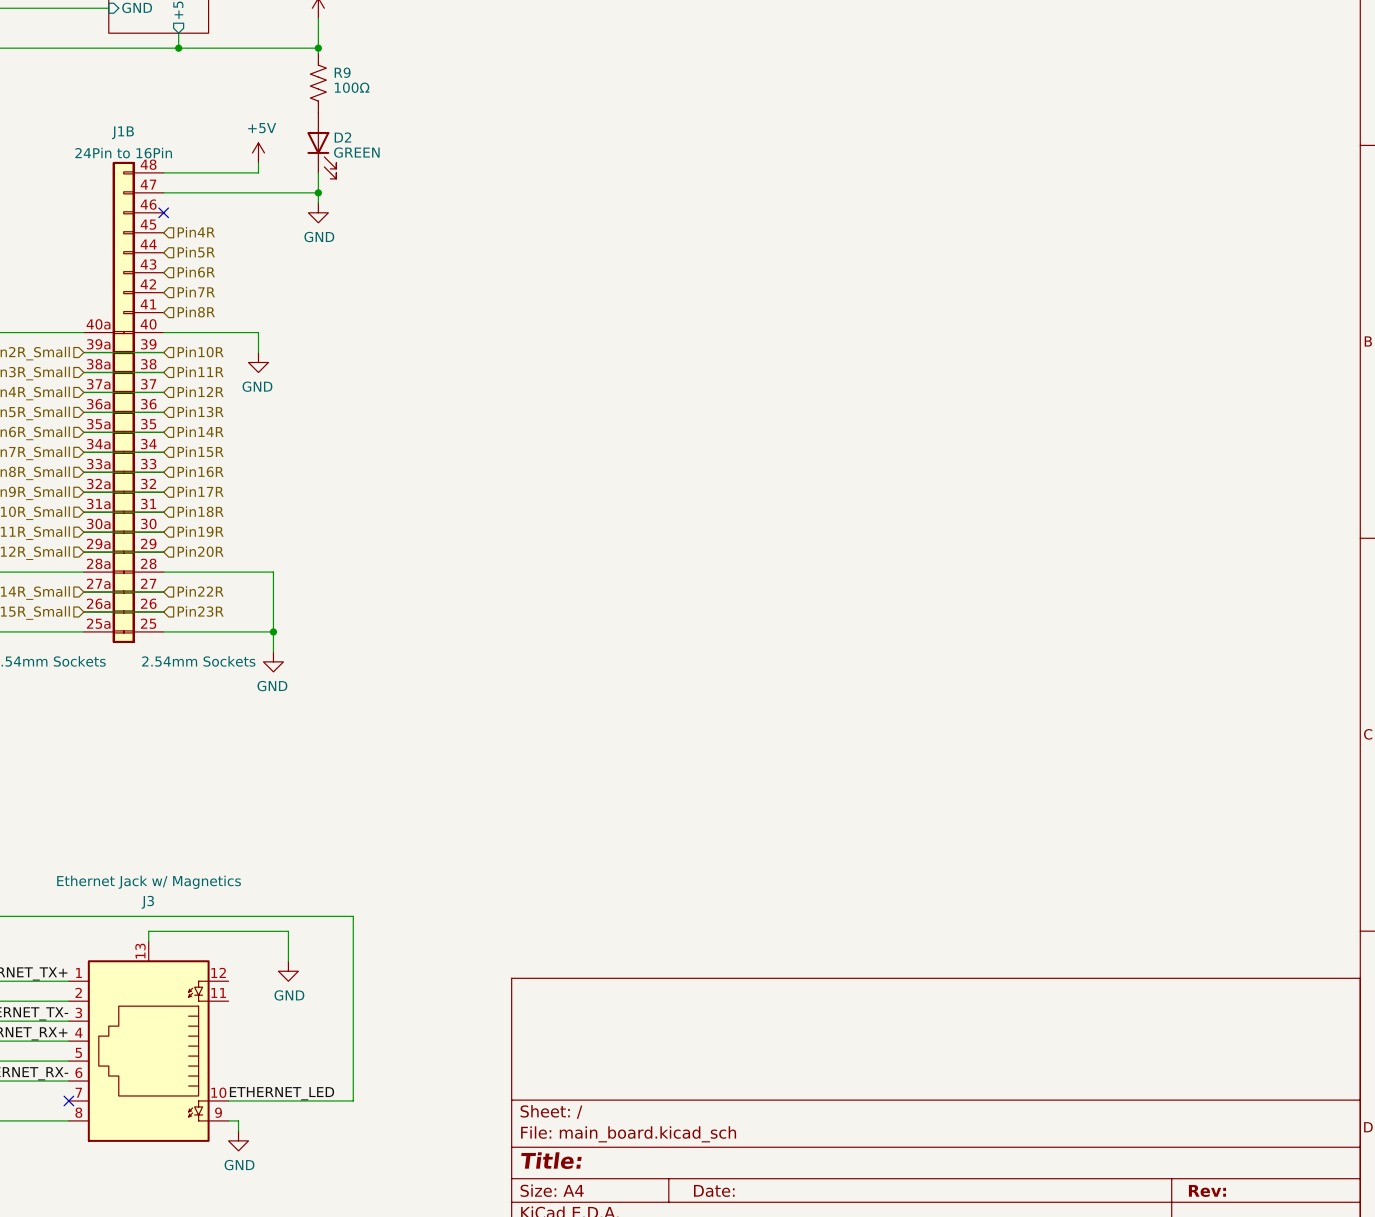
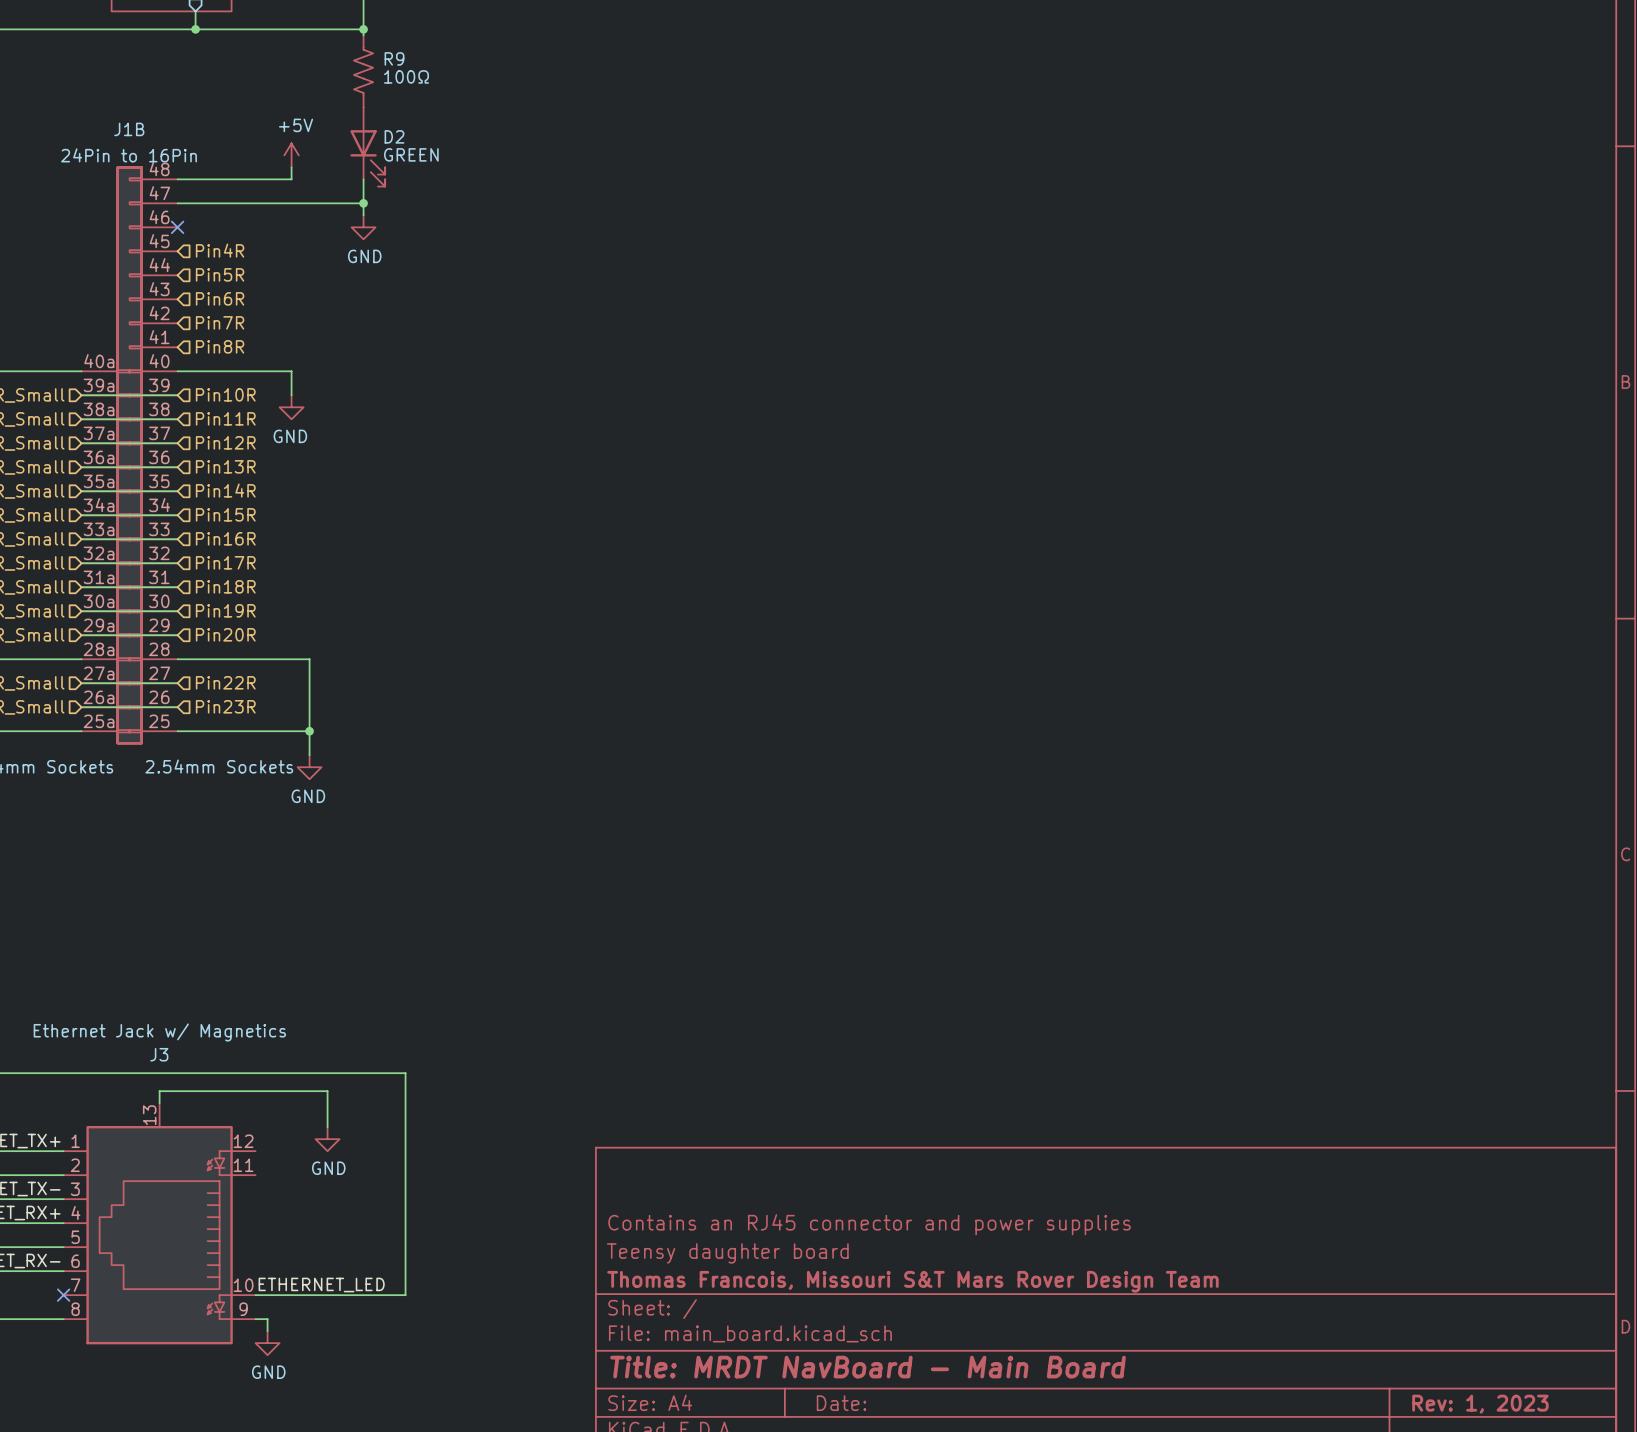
title block: none -> Contains an RJ45 connector and power supplies (869, 1224)
title block: none -> Teensy daughter board (727, 1253)
title block: none -> Thomas Francois, Missouri S&T Mars Rover Design Team (912, 1281)
title block: Title: (551, 1160) -> Title: MRDT NavBoard - Main Board (868, 1367)
title block: Rev: (1207, 1190) -> Rev: 1, 2023 (1480, 1404)

